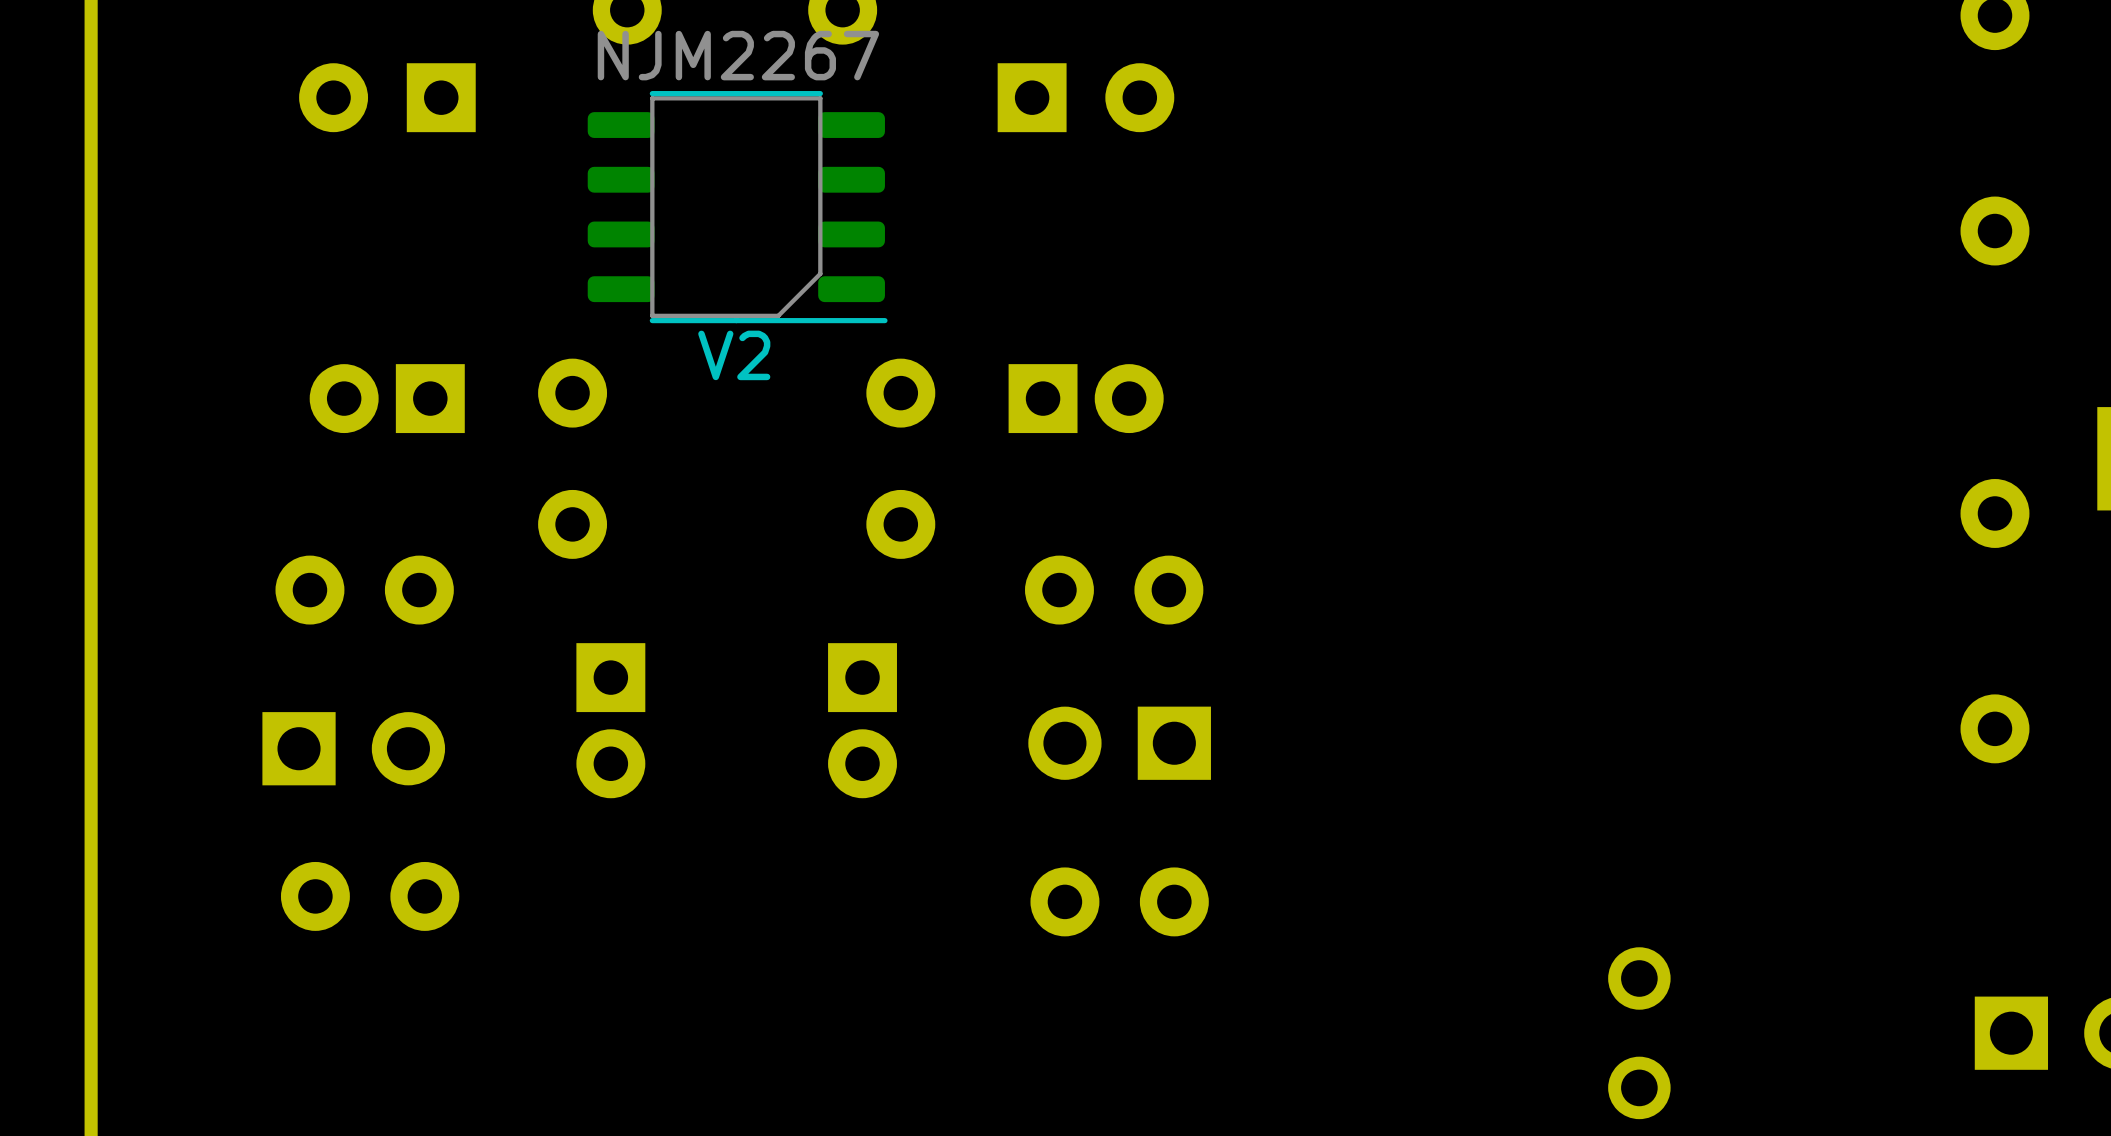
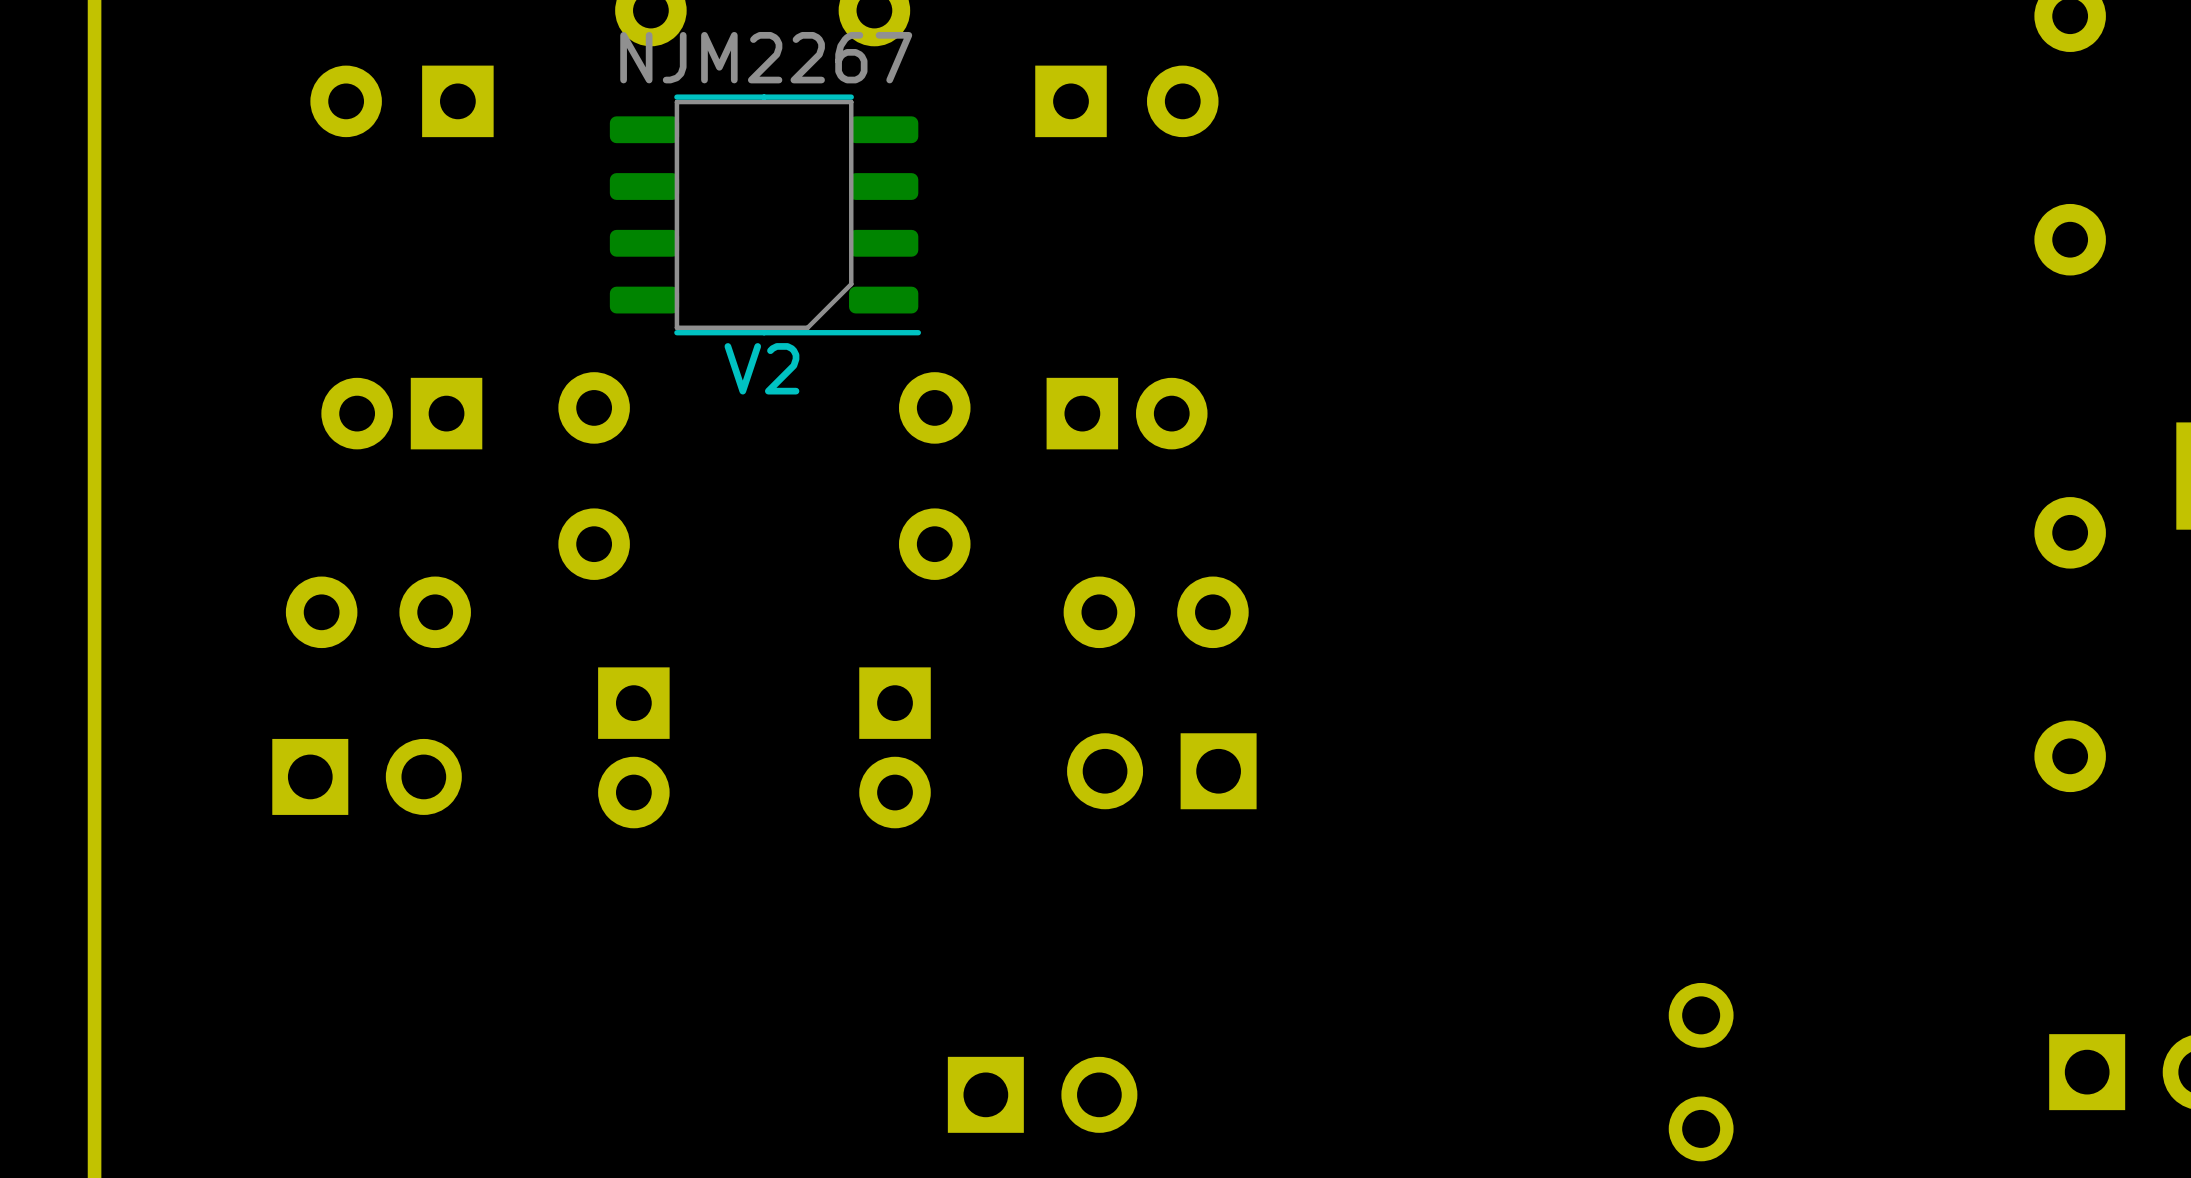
part: (370, 896) -> none
part: (1119, 901) -> none
part: none -> (1042, 1094)

